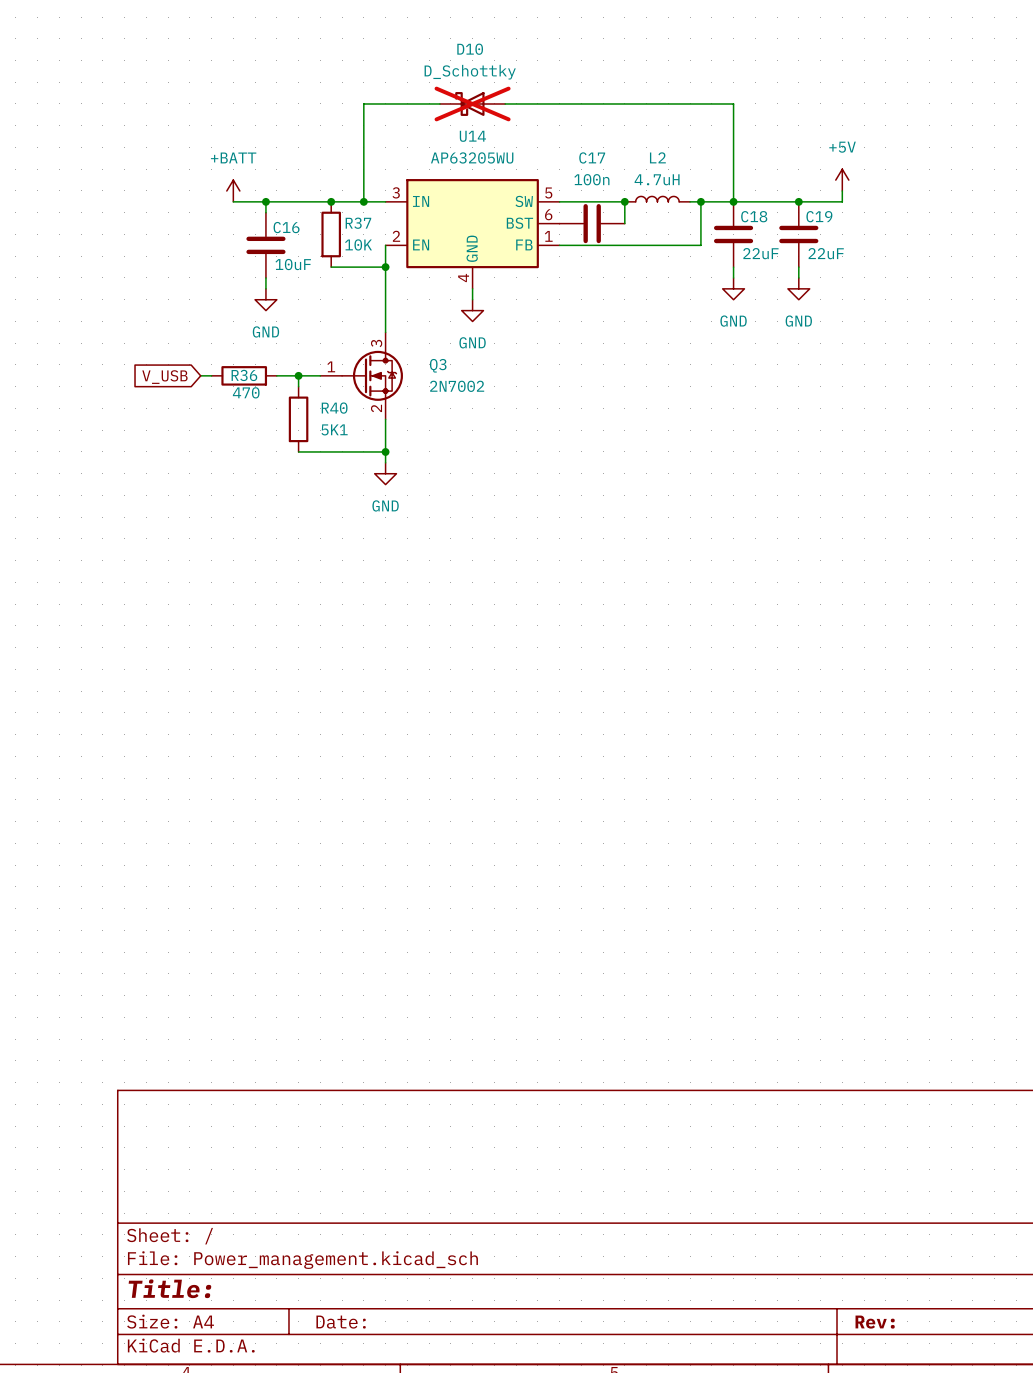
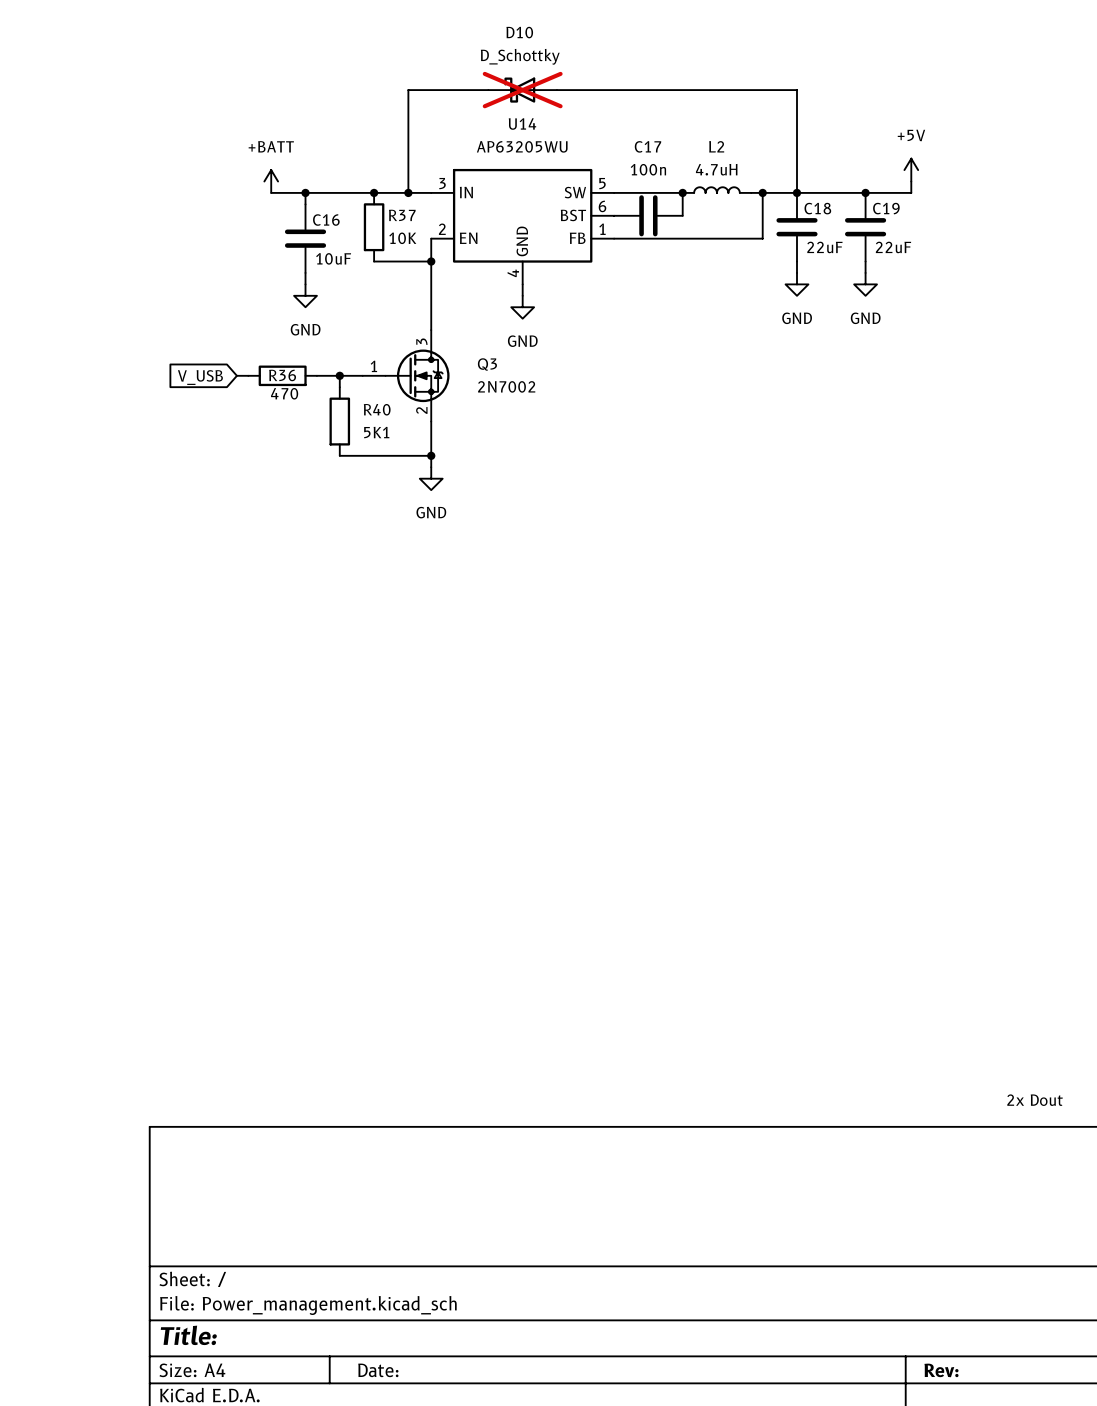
text: none -> 2x Dout (1035, 1100)

